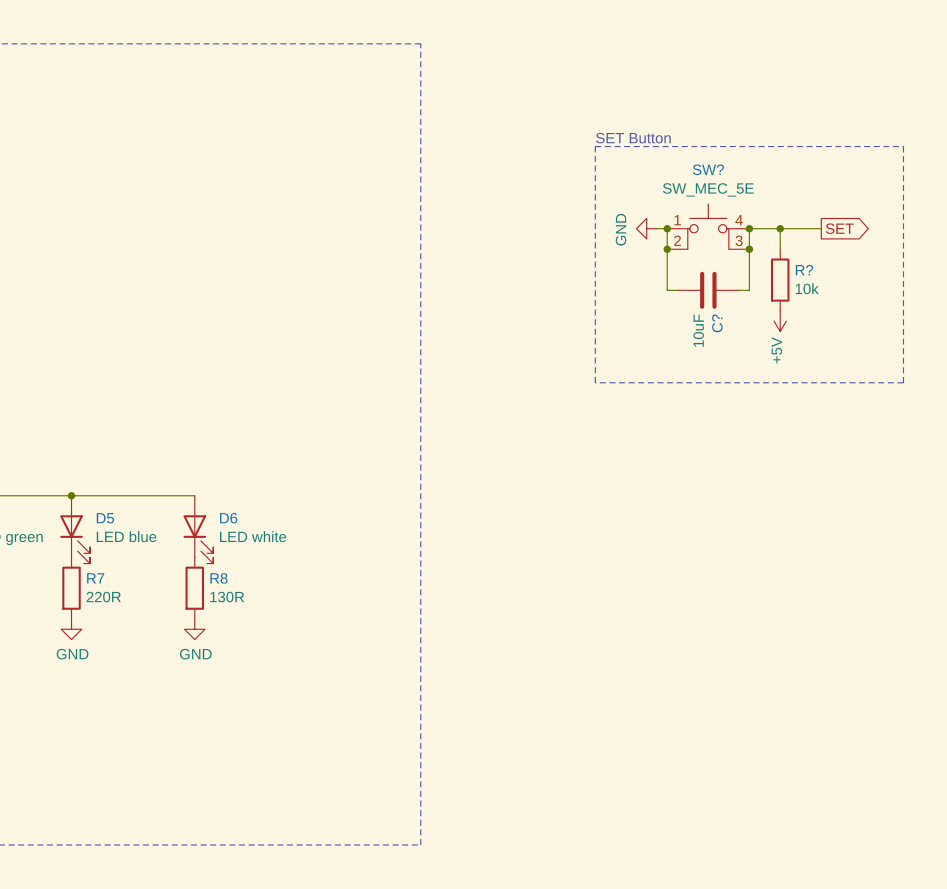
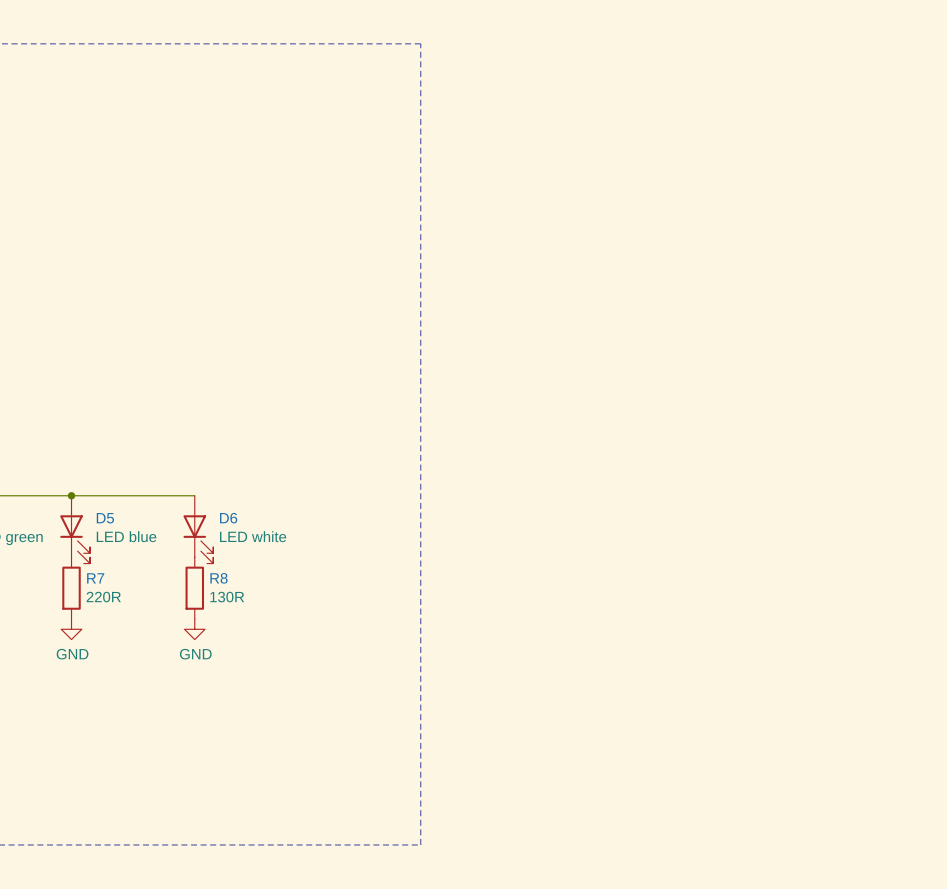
text: SET Button (633, 138) -> none
line: (595, 146) (903, 146) (903, 382) (595, 382) (595, 146) -> none
SW?: SW_MEC_5E (708, 226) -> none
power symbol: GND (646, 228) -> none
wire: (656, 228) (667, 228) (667, 290) (677, 290) -> none
junction: (667, 228) -> none
junction: (749, 228) -> none
wire: (780, 228) (780, 249) -> none
junction: (780, 228) -> none
wire: (821, 228) (749, 228) (749, 290) (739, 290) -> none
global label: SET (839, 228) -> none
junction: (667, 249) -> none
junction: (749, 249) -> none
R?: 10k (780, 280) -> none
C?: 10uF (708, 290) -> none
power symbol: +5V (780, 321) -> none

